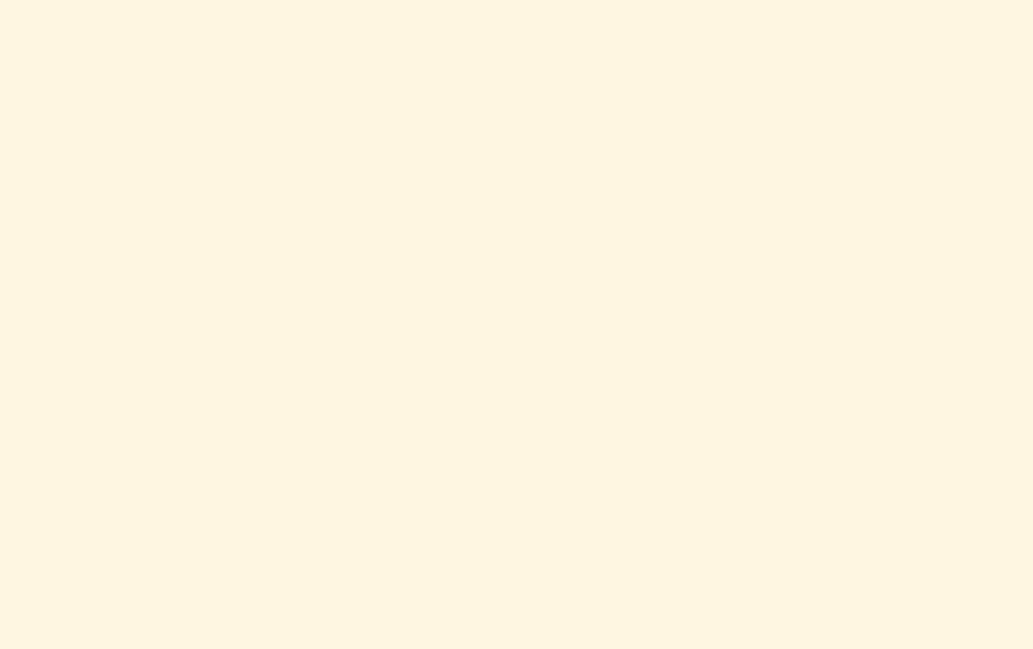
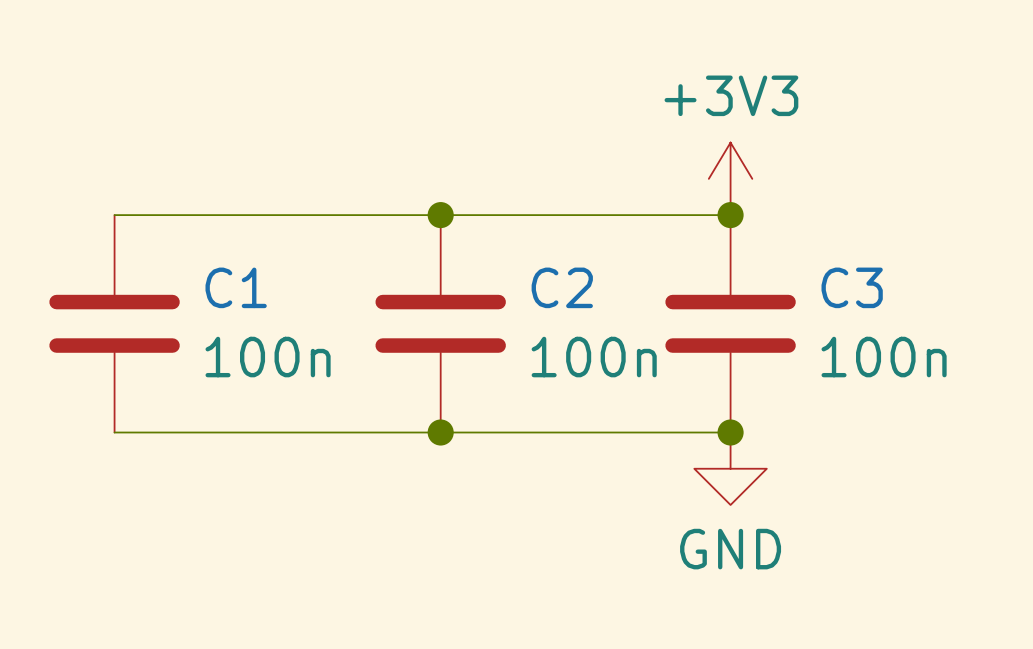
power symbol: none -> +3V3 (730, 178)
wire: none -> (114, 215) (730, 215)
junction: none -> (440, 215)
junction: none -> (730, 215)
C1: none -> 100n (114, 323)
C2: none -> 100n (440, 323)
C3: none -> 100n (730, 323)
wire: none -> (114, 432) (730, 432)
junction: none -> (440, 432)
junction: none -> (730, 432)
power symbol: none -> GND (730, 468)

